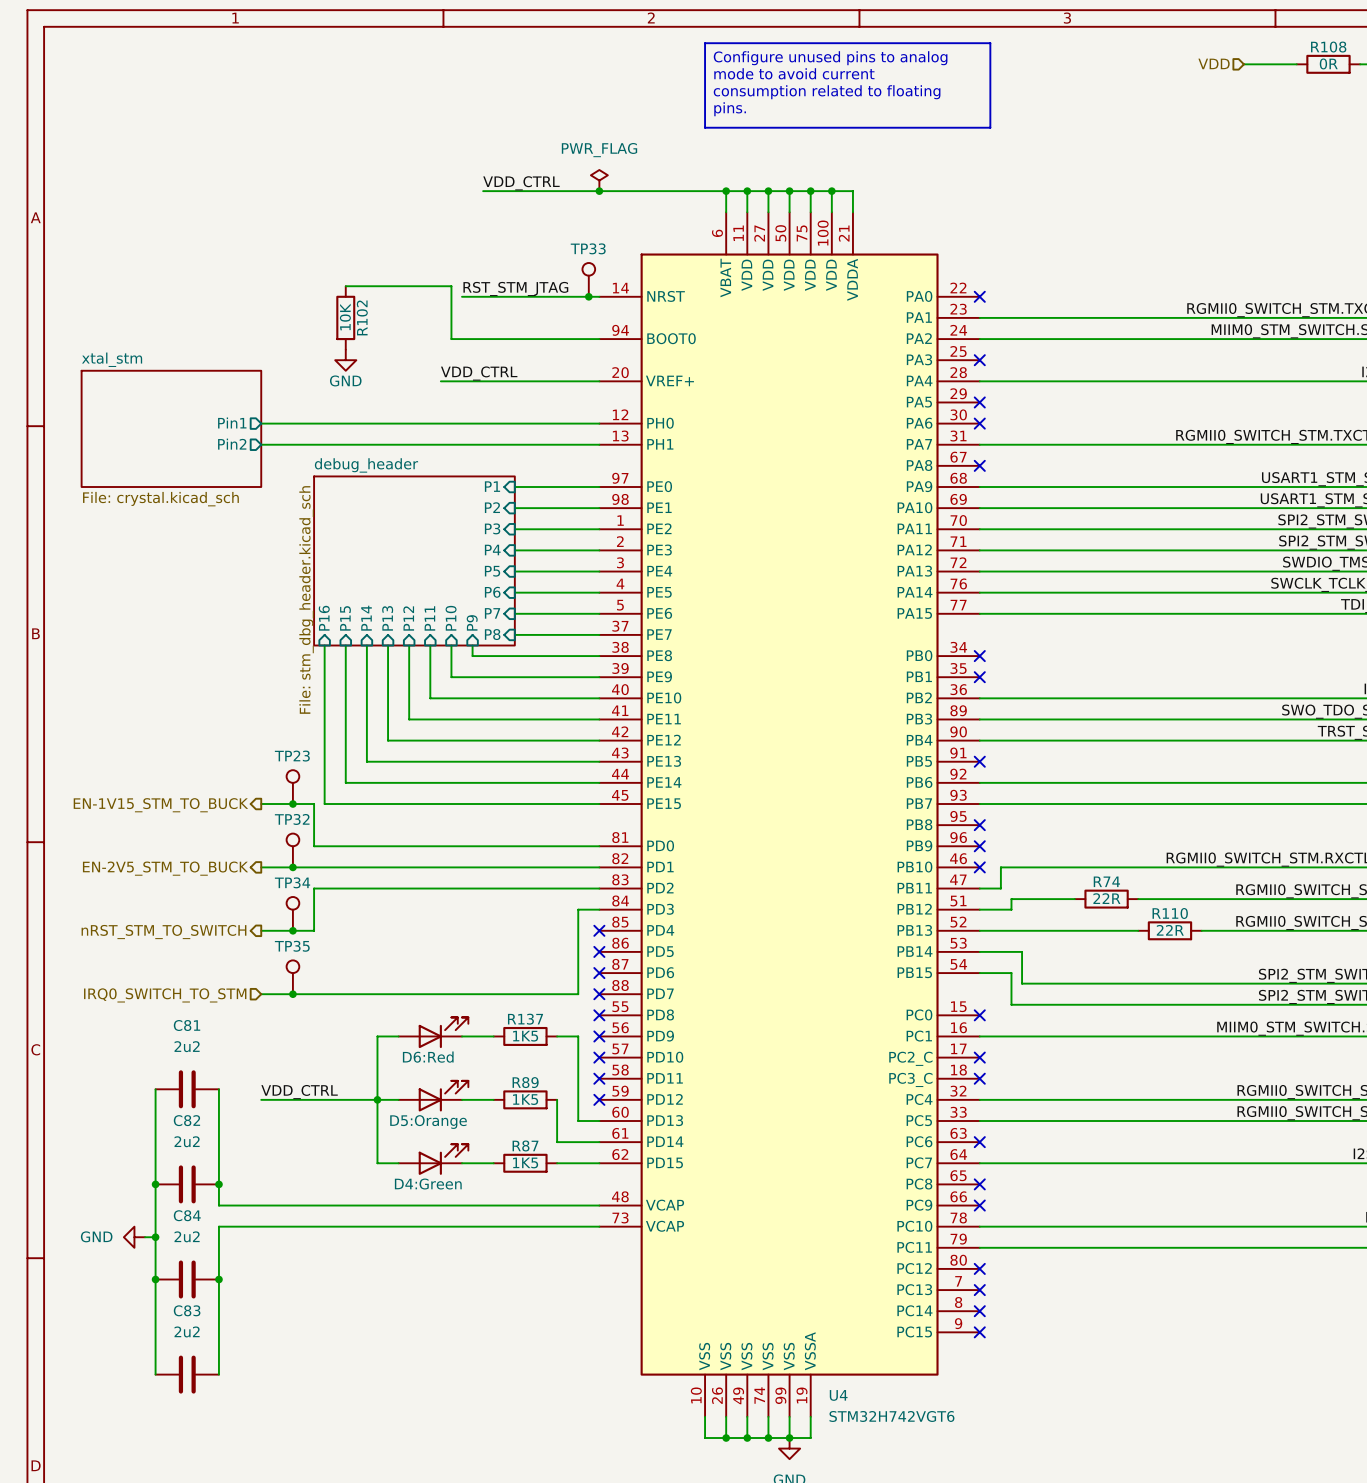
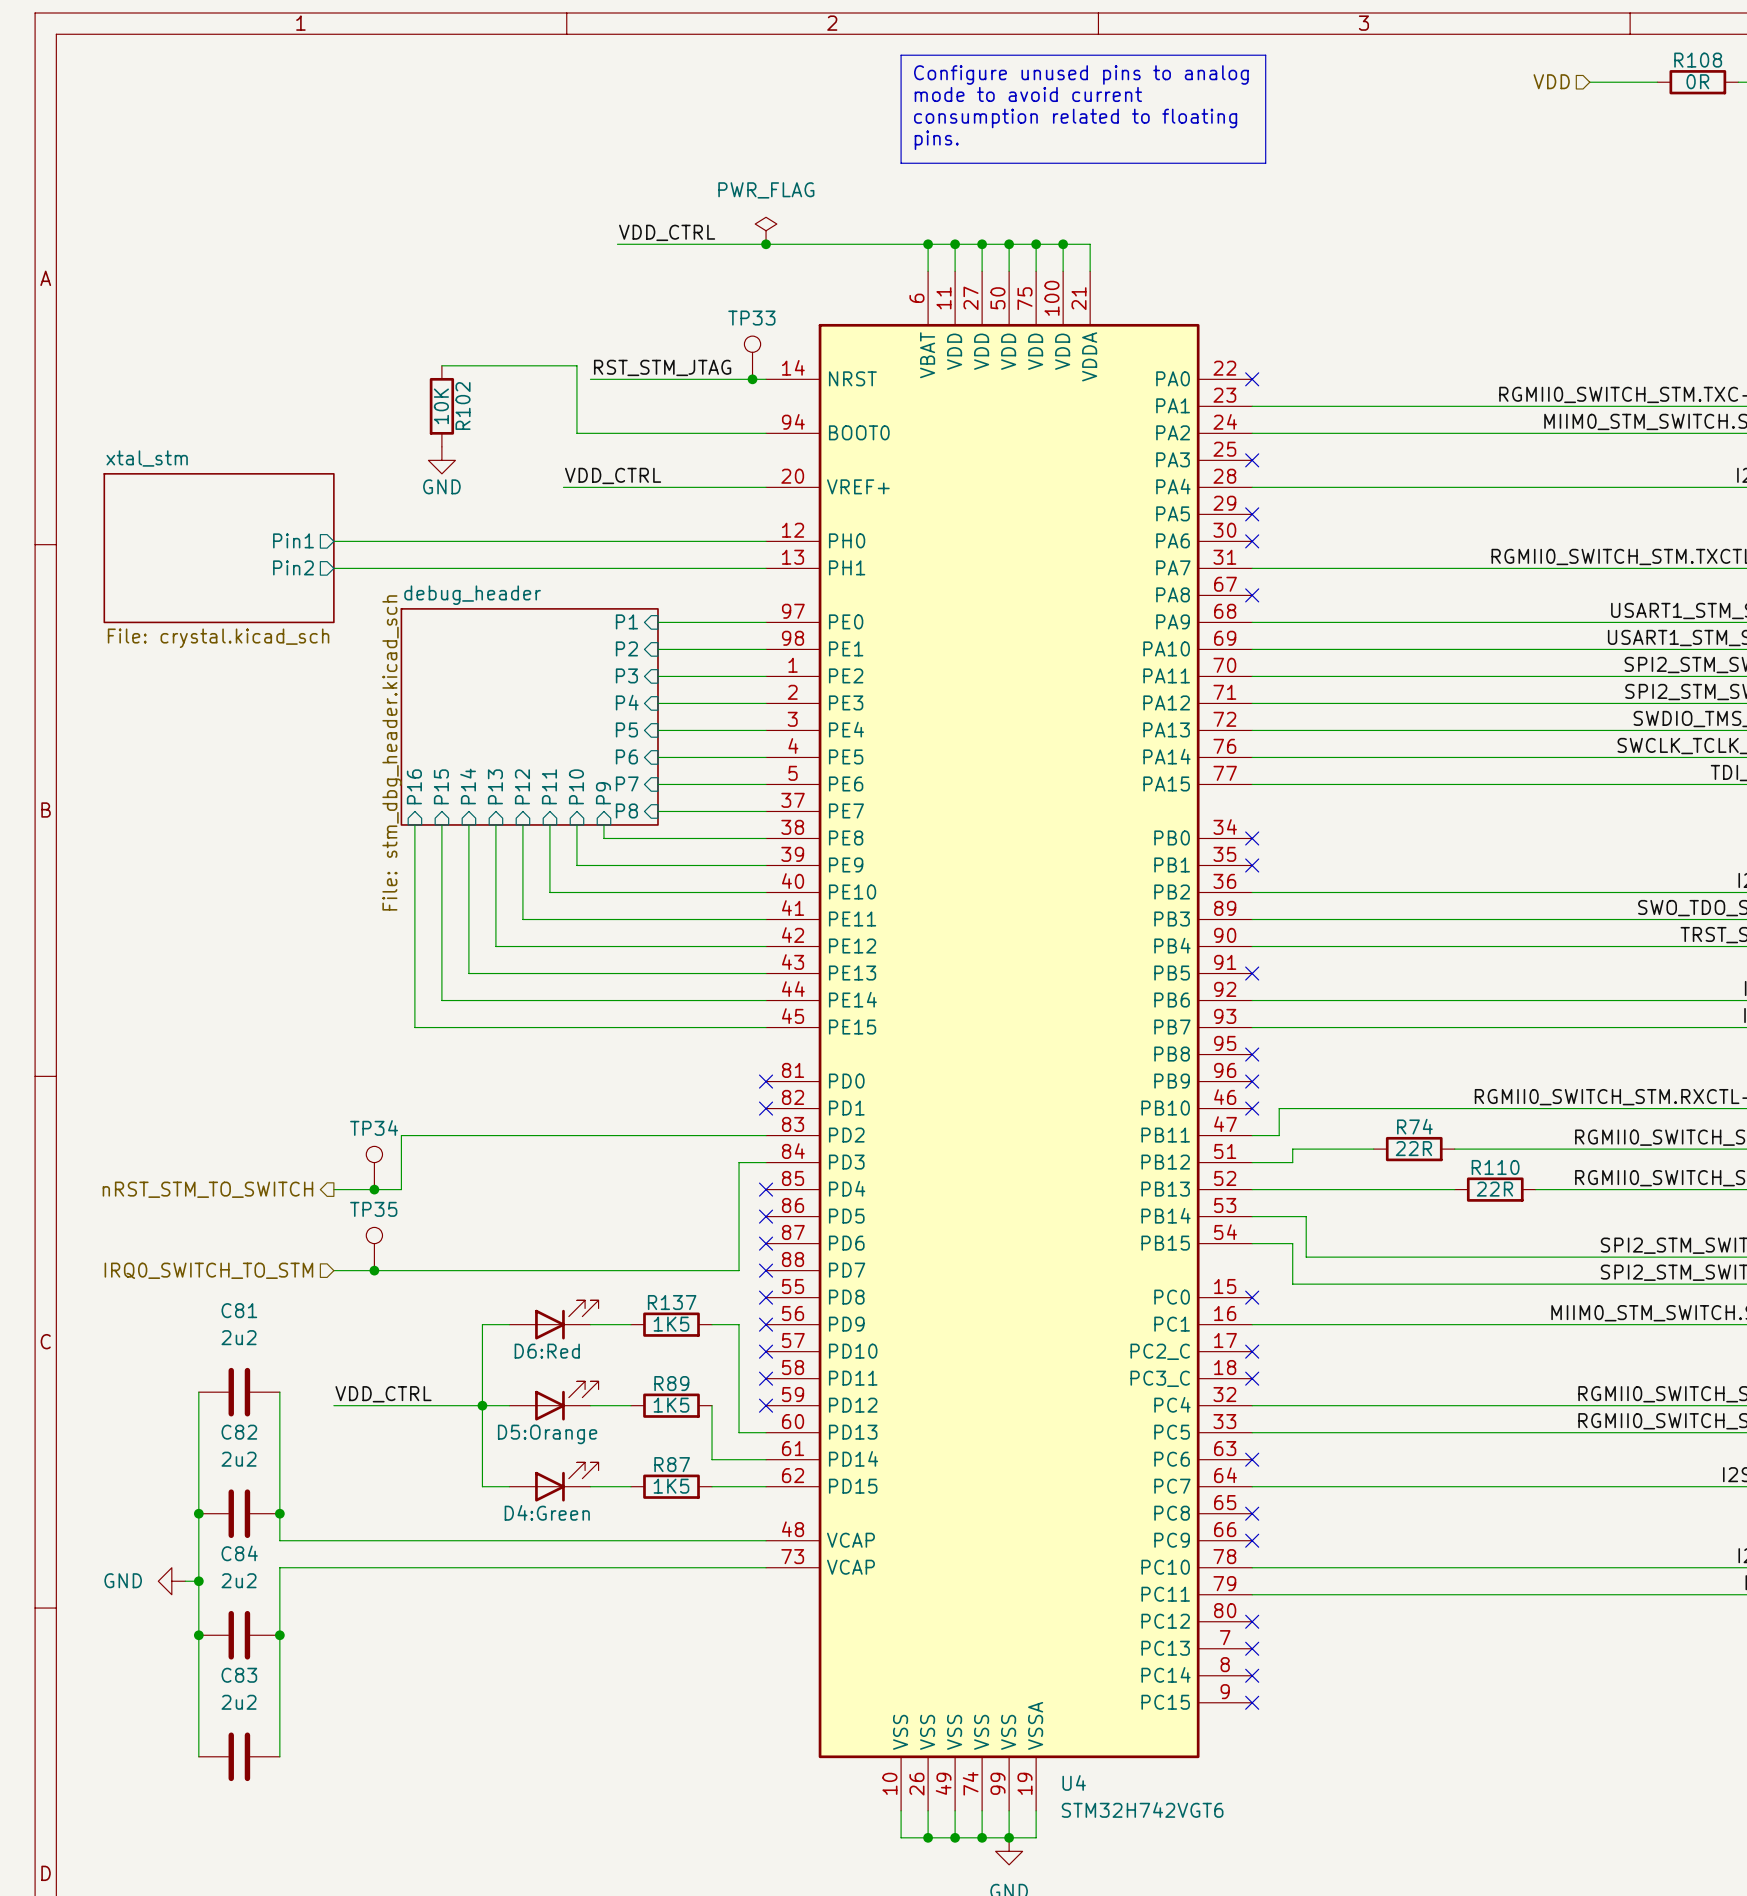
TP23: (292, 787) -> none
wire: (261, 804) (314, 804) (314, 846) (599, 846) -> none
junction: (292, 804) -> none
hierarchical label: EN-1V15_STM_TO_BUCK (160, 805) -> none
no-connect mark: none -> (766, 1081)
TP32: (292, 850) -> none
wire: (261, 867) (599, 867) -> none
junction: (292, 867) -> none
no-connect mark: none -> (766, 1108)
hierarchical label: EN-2V5_STM_TO_BUCK (165, 868) -> none

